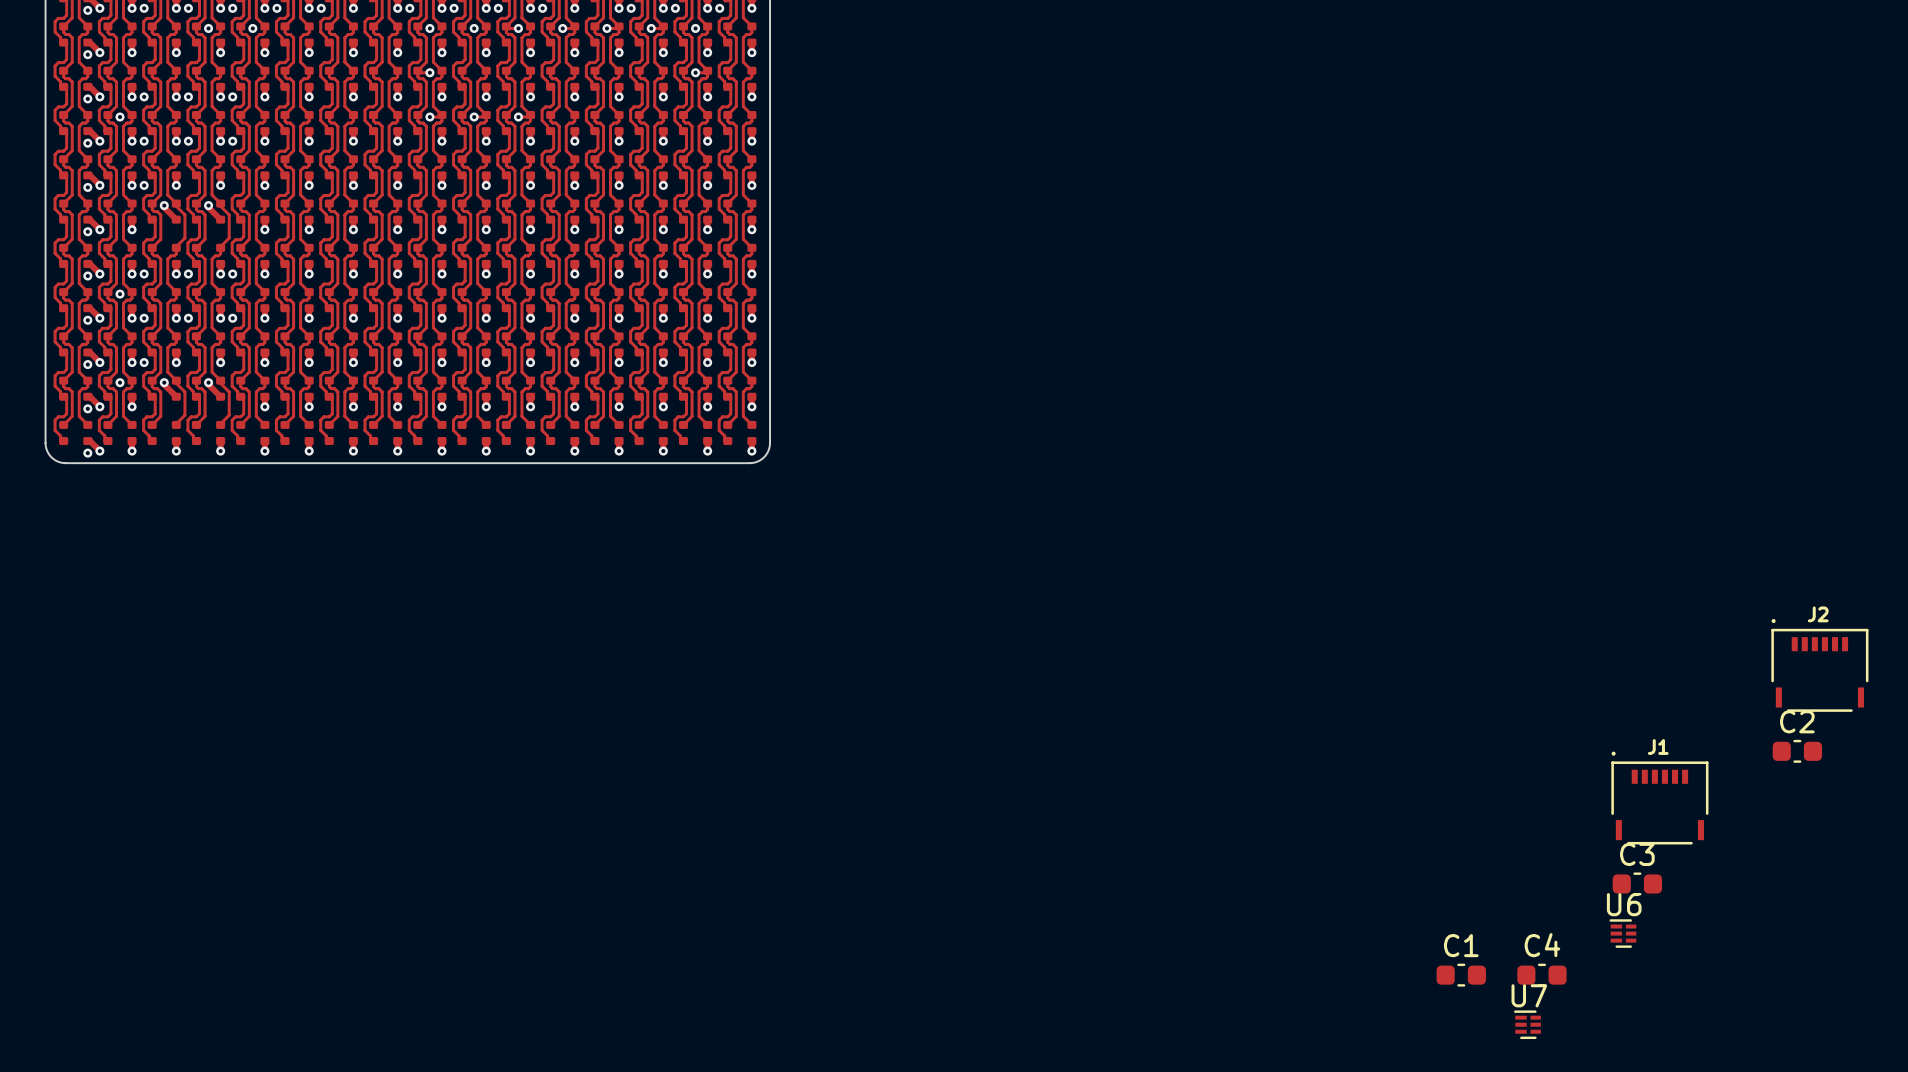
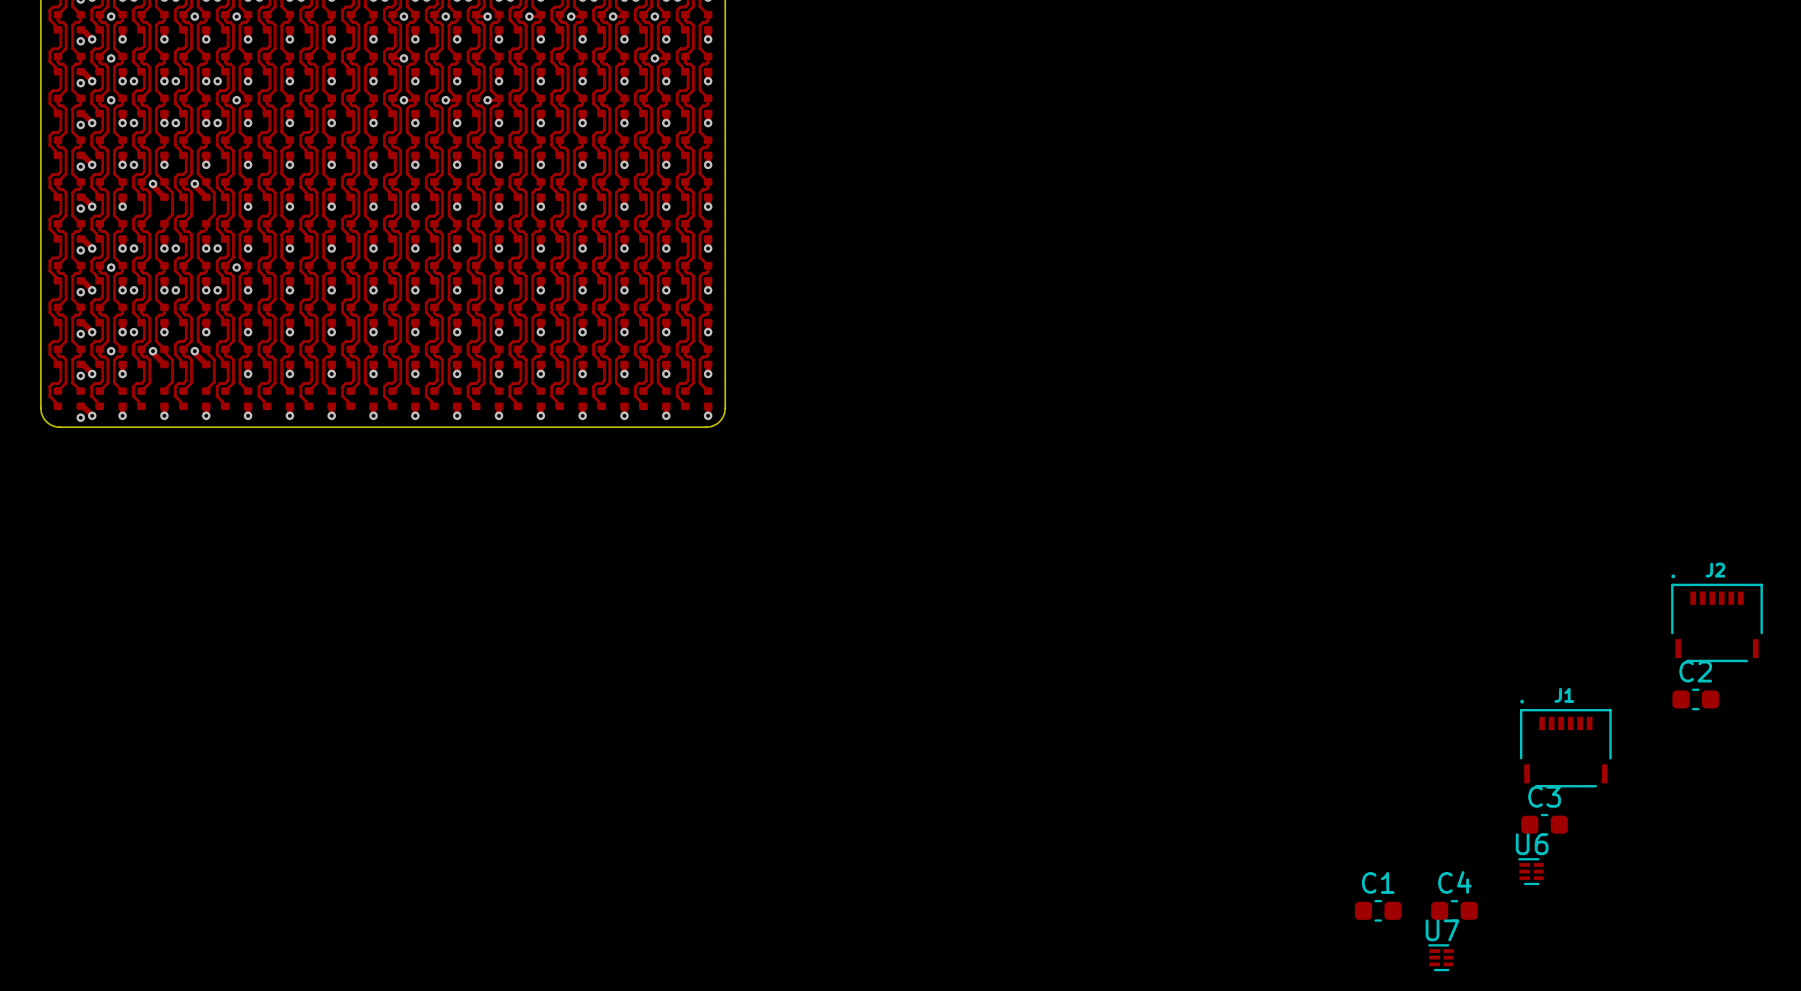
via: none -> (111, 16)
via: none -> (111, 58)
via: none -> (236, 100)
via: none -> (236, 267)

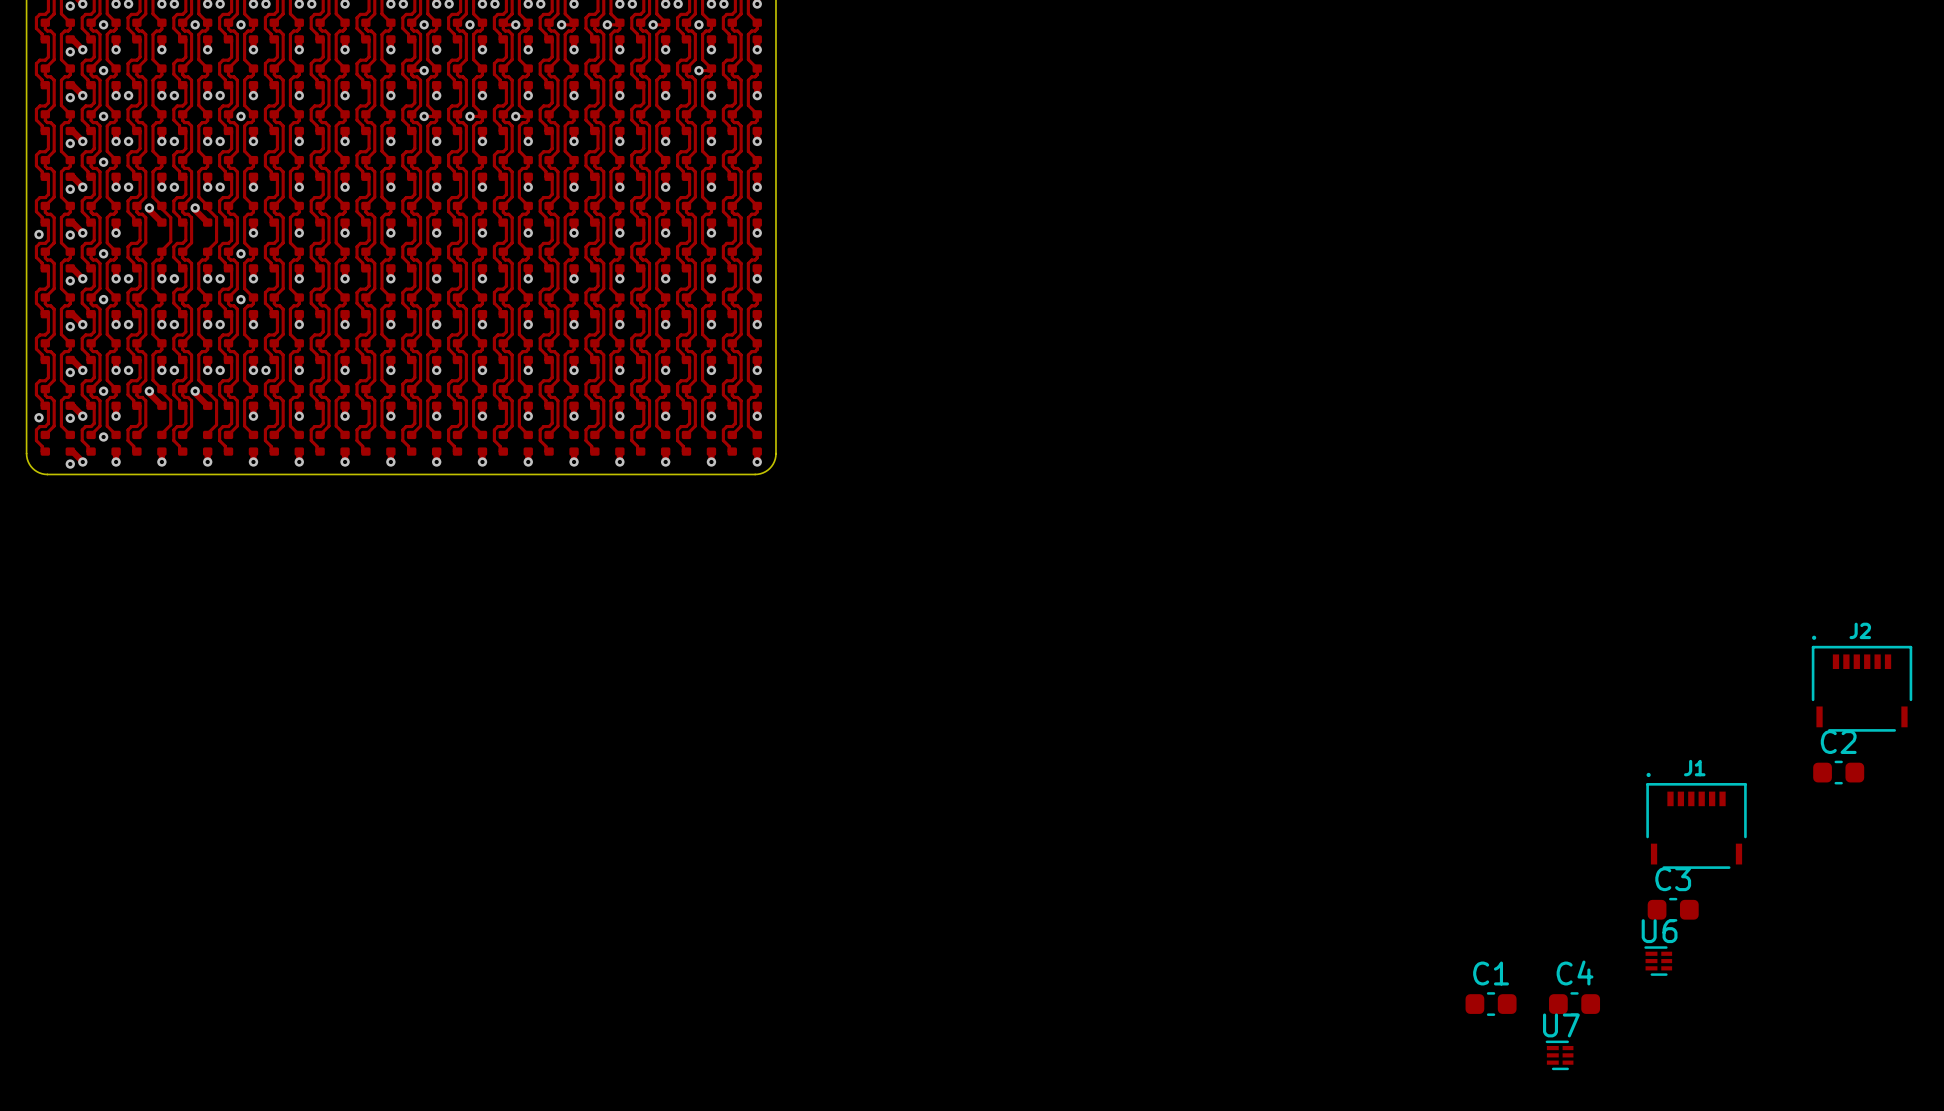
via: none -> (103, 162)
via: none -> (174, 187)
via: none -> (220, 187)
via: none -> (39, 234)
via: none -> (103, 253)
via: none -> (240, 253)
via: none -> (174, 370)
via: none -> (220, 370)
via: none -> (265, 370)
via: none -> (39, 417)
via: none -> (103, 437)

